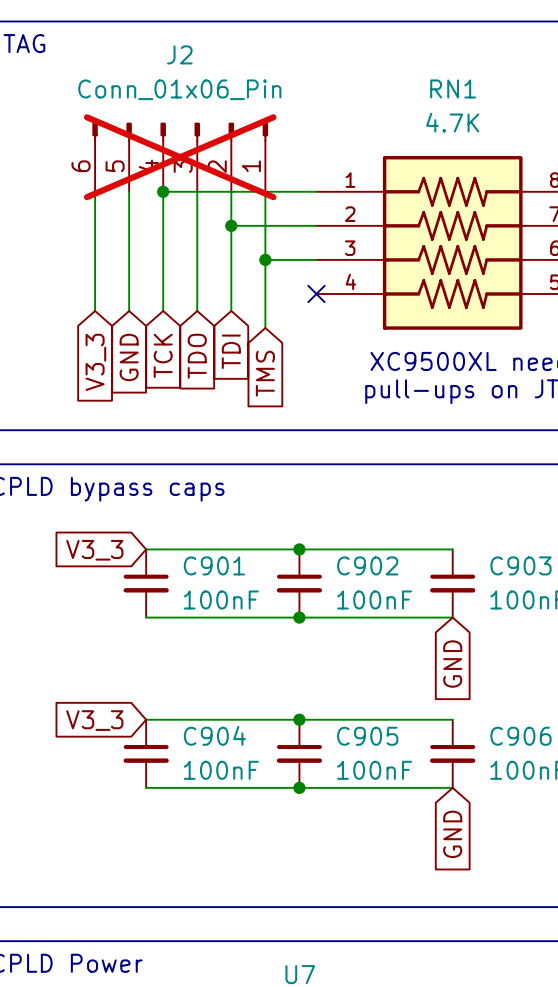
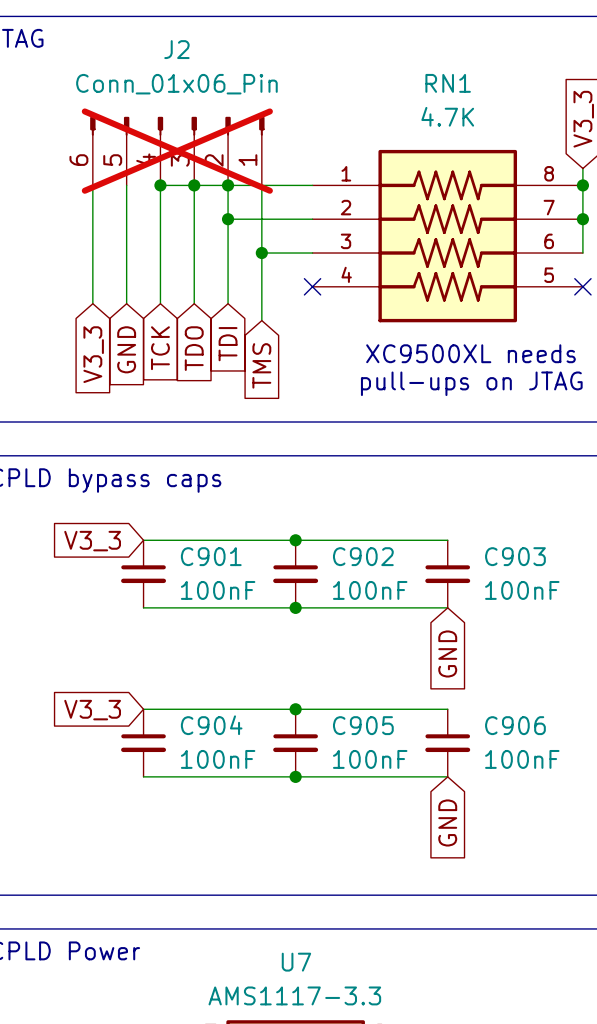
junction: none -> (194, 185)
junction: none -> (228, 185)

